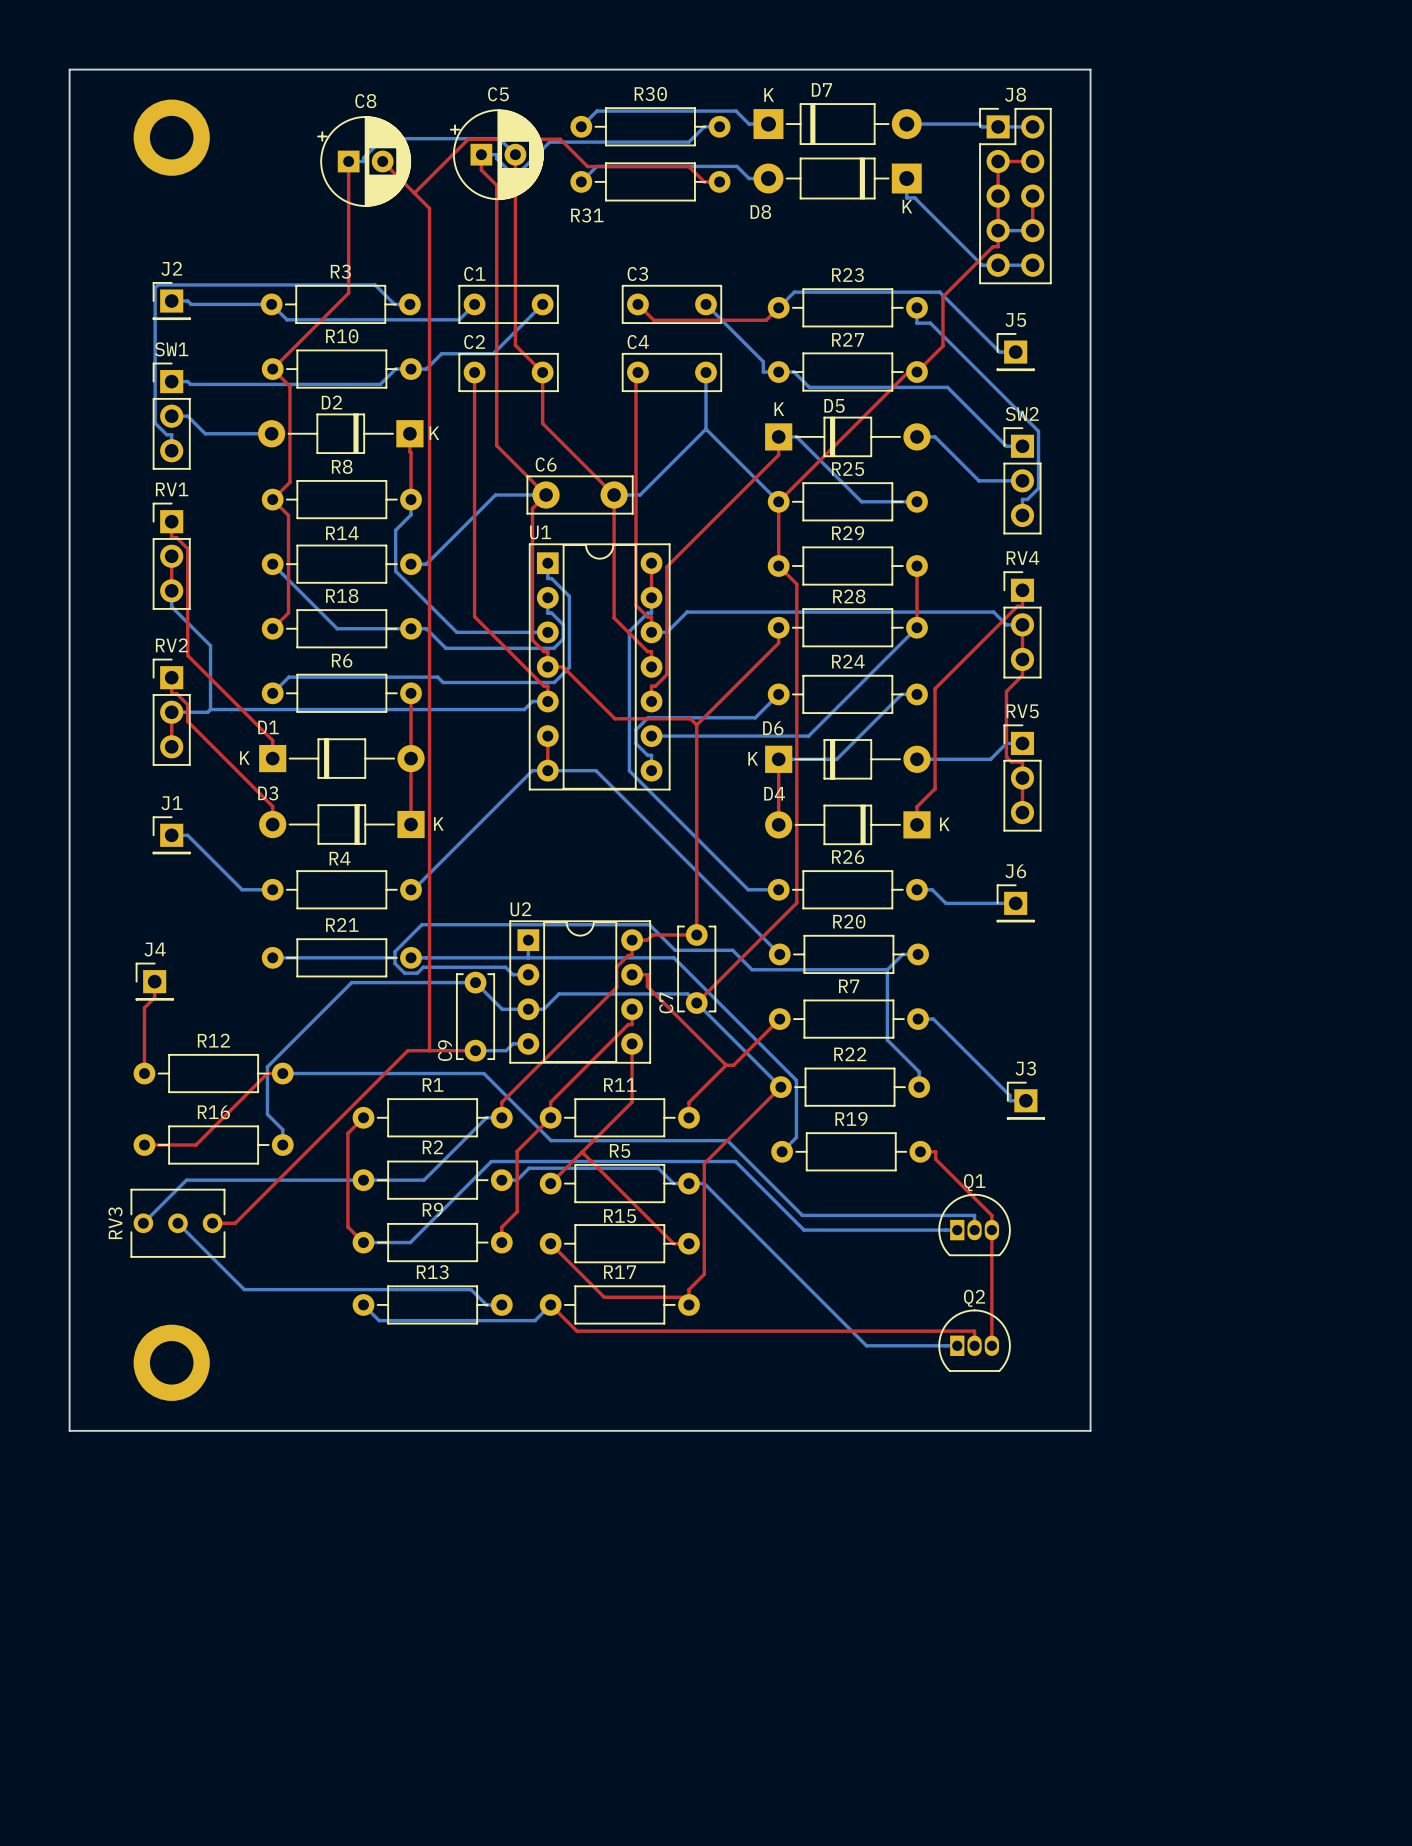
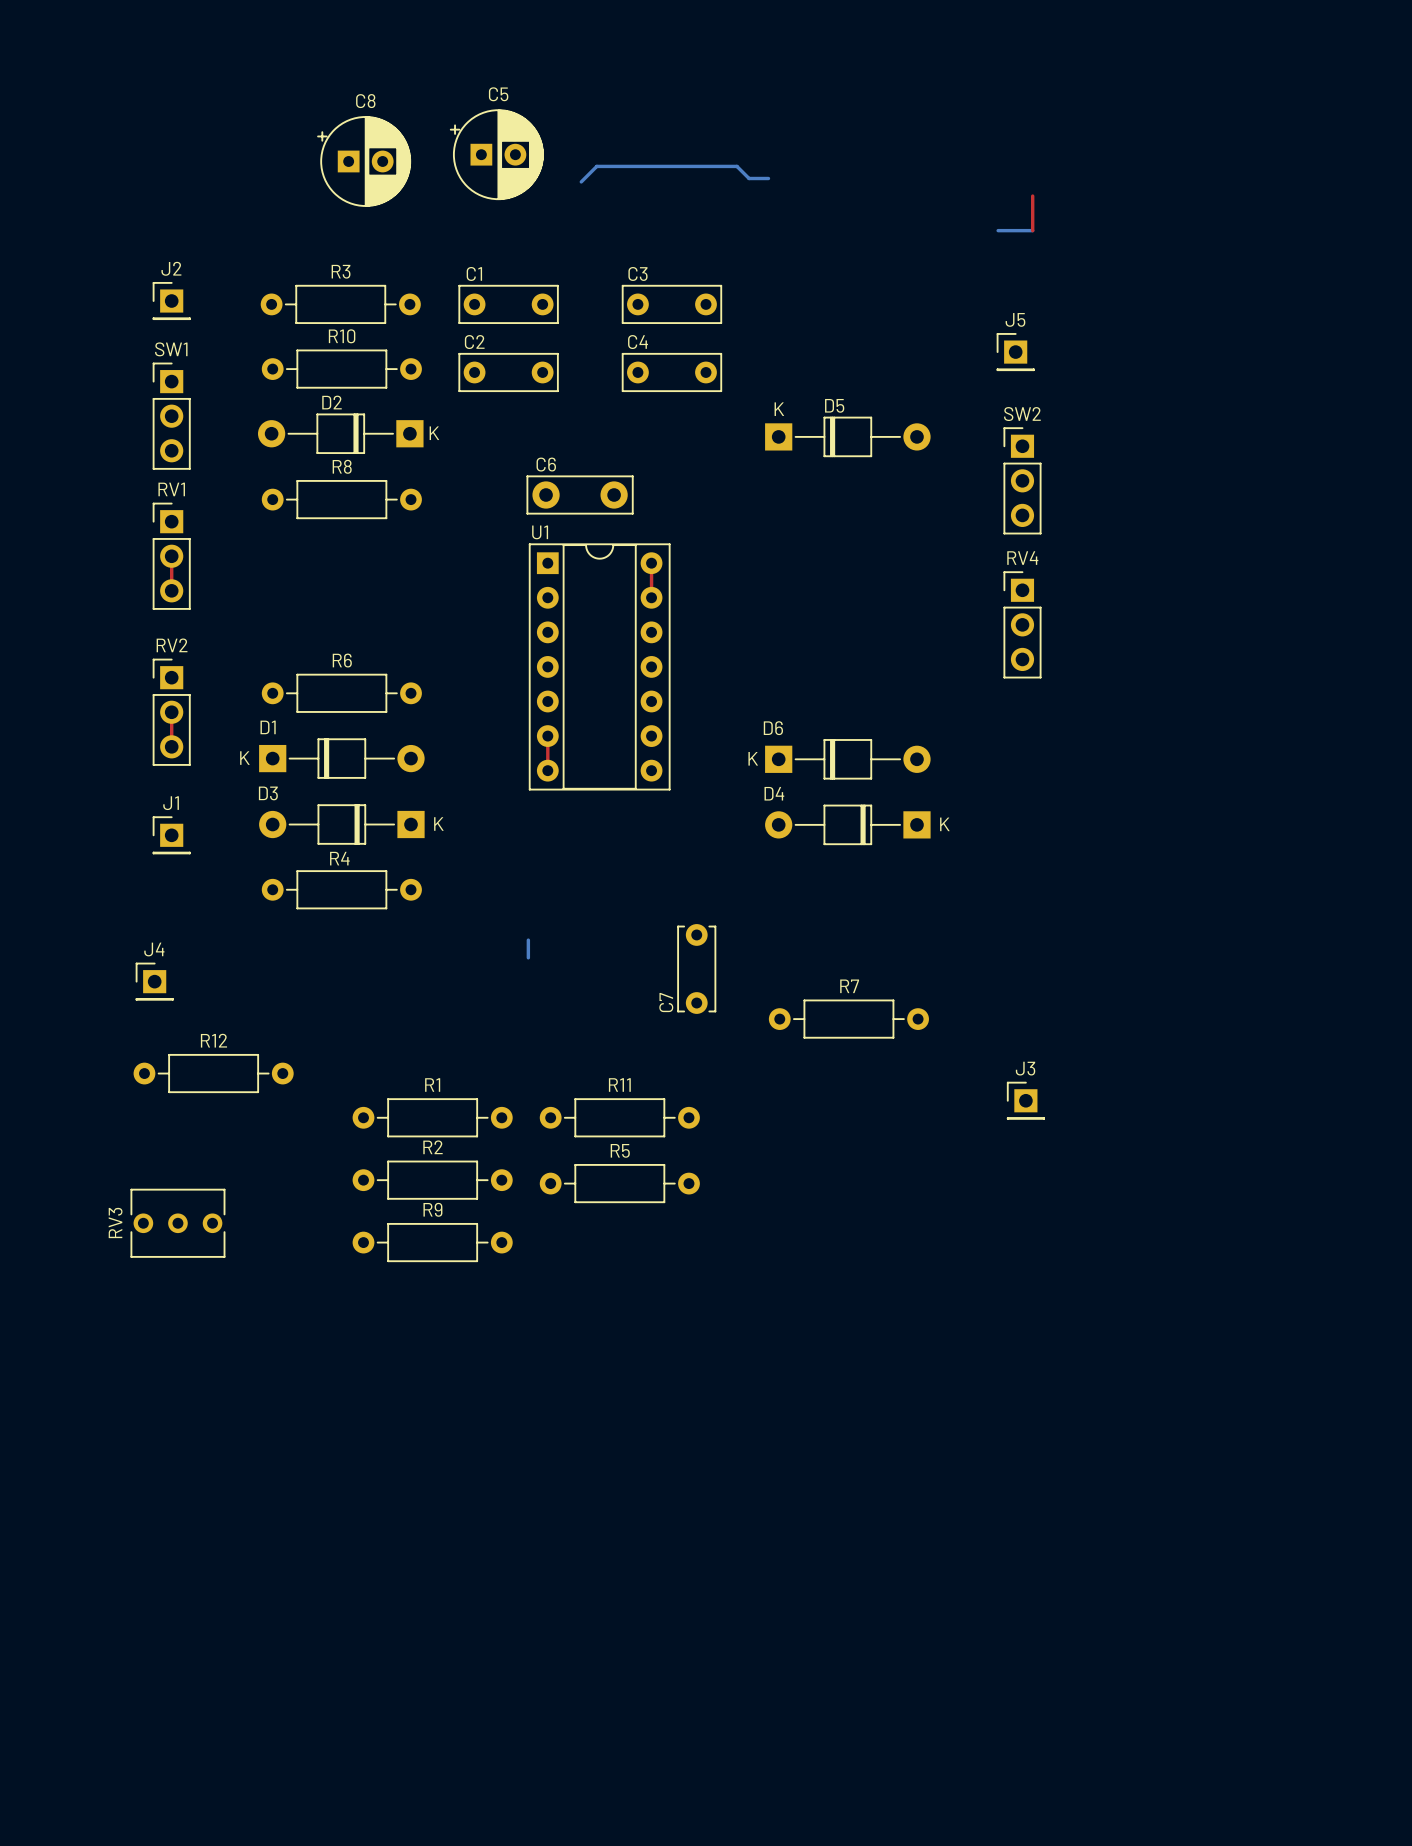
board edge: (69, 69) (1090, 69) (1090, 1430) (69, 1430) (69, 69) -> none
bottom track: (768, 124) (749, 124) (736, 111) (597, 111) (581, 126) -> none
D7: (837, 124) -> none
bottom track: (906, 124) (979, 124) (982, 126) (1032, 126) -> none
R30: (650, 126) -> none
bottom track: (719, 126) (704, 126) (688, 142) (549, 142) (521, 170) (508, 170) (496, 158) (496, 154) (481, 154) -> none
part: (171, 137) -> none
top track: (481, 154) (481, 170) (496, 185) (496, 445) (546, 495) (532, 508) (532, 640) (543, 651) (547, 651) (547, 666) (563, 666) (615, 718) (690, 718) (696, 725) -> none
bottom track: (515, 154) (499, 138) (383, 138) (364, 157) (364, 161) (348, 161) -> none
top track: (515, 154) (515, 345) (542, 372) (542, 423) (614, 495) (614, 617) (647, 651) (651, 651) (651, 666) -> none
top track: (348, 161) (348, 293) (272, 369) (289, 386) (289, 482) (272, 499) (288, 515) (288, 612) (272, 628) -> none
top track: (382, 161) (429, 208) (429, 1050) -> none
top track: (1032, 161) (998, 161) (998, 246) (993, 246) (942, 296) (942, 346) (916, 372) (908, 372) (778, 501) (778, 566) (796, 584) (796, 902) (696, 1003) -> none
D8: (837, 178) -> none
bottom track: (906, 178) (906, 197) (914, 197) (982, 265) (1032, 265) -> none
R31: (650, 181) -> none
top track: (719, 181) (704, 181) (688, 166) (587, 166) (560, 139) (468, 139) (414, 193) -> none
J8: (1015, 196) -> none
bottom track: (171, 301) (187, 301) (191, 304) (271, 304) (287, 319) (459, 319) (474, 304) -> none
bottom track: (409, 304) (394, 304) (375, 284) (158, 284) (155, 287) (155, 423) (166, 434) (171, 434) (171, 450) -> none
bottom track: (542, 304) (493, 353) (441, 353) (426, 369) (395, 369) (380, 384) (190, 384) (187, 381) (171, 381) -> none
top track: (637, 304) (653, 320) (766, 320) (778, 307) -> none
bottom track: (705, 304) (763, 361) (763, 372) (794, 372) (809, 387) (947, 387) (1006, 446) (1022, 446) -> none
bottom track: (778, 307) (794, 292) (939, 292) (999, 352) (1015, 352) -> none
R23: (847, 307) -> none
bottom track: (916, 307) (916, 323) (930, 323) (1038, 431) (1038, 488) (1027, 499) (1022, 499) (1022, 515) -> none
top track: (474, 372) (474, 616) (543, 686) (547, 686) (547, 701) -> none
top track: (637, 372) (636, 374) (636, 605) (647, 617) (651, 617) (651, 632) -> none
bottom track: (705, 372) (705, 429) -> none
R27: (847, 372) -> none
bottom track: (171, 416) (187, 416) (205, 433) (271, 433) -> none
bottom track: (705, 429) (640, 495) (614, 495) -> none
bottom track: (705, 429) (778, 501) -> none
top track: (409, 433) (411, 499) -> none
bottom track: (778, 436) (796, 436) (861, 501) (916, 501) -> none
top track: (778, 436) (778, 454) (666, 566) (666, 674) (655, 686) (651, 686) (651, 701) -> none
bottom track: (916, 436) (935, 436) (978, 480) (1022, 480) -> none
bottom track: (546, 495) (495, 495) (426, 564) (411, 564) -> none
bottom track: (411, 499) (411, 514) (395, 530) (395, 571) (456, 632) (547, 632) -> none
R25: (847, 501) -> none
top track: (171, 521) (171, 537) (176, 537) (187, 548) (187, 655) (272, 740) (272, 758) -> none
bottom track: (547, 563) (547, 578) (551, 578) (569, 596) (569, 667) (554, 682) (443, 682) (437, 677) (288, 677) (272, 693) -> none
bottom track: (272, 564) (337, 628) (426, 628) (445, 648) (554, 648) (563, 639) (563, 624) (551, 613) (547, 613) (547, 597) -> none
R14: (341, 564) -> none
R29: (847, 566) -> none
top track: (916, 566) (916, 627) -> none
bottom track: (171, 590) (171, 606) (210, 645) (210, 709) -> none
top track: (1022, 590) (1022, 606) (1017, 606) (935, 688) (935, 788) (916, 806) (916, 824) -> none
bottom track: (651, 597) (651, 613) (647, 613) (629, 631) (629, 770) (748, 889) (778, 889) -> none
bottom track: (1022, 624) (1006, 624) (993, 612) (687, 612) (666, 632) (651, 632) -> none
top track: (1022, 624) (1022, 675) (1006, 691) (1006, 756) (1011, 761) (1022, 761) (1022, 812) -> none
top track: (778, 627) (778, 643) (696, 725) -> none
R28: (847, 627) -> none
bottom track: (916, 627) (808, 736) (651, 736) -> none
R18: (341, 628) -> none
top track: (171, 677) (171, 693) (176, 693) (187, 704) (187, 721) (272, 806) (272, 824) -> none
top track: (411, 693) (411, 824) -> none
bottom track: (778, 694) (755, 717) (648, 717) (636, 729) (636, 743) (647, 755) (651, 755) (651, 770) -> none
R24: (847, 694) -> none
bottom track: (916, 694) (901, 694) (836, 759) (778, 759) -> none
bottom track: (547, 701) (532, 701) (524, 709) (210, 709) -> none
bottom track: (210, 709) (207, 712) (171, 712) -> none
top track: (696, 725) (696, 934) (652, 934) (647, 940) (632, 940) (632, 955) (628, 955) (616, 966) (616, 987) (501, 1102) (501, 1117) -> none
bottom track: (1022, 743) (1006, 743) (990, 759) (916, 759) -> none
top track: (778, 759) (778, 824) -> none
RV5: (1022, 778) -> none
bottom track: (171, 835) (187, 835) (242, 889) (272, 889) -> none
bottom track: (411, 889) (413, 889) (532, 770) (596, 770) (779, 954) -> none
R26: (847, 889) -> none
bottom track: (916, 889) (932, 889) (945, 903) (1015, 903) -> none
J6: (1015, 903) -> none
R20: (848, 954) -> none
bottom track: (918, 954) (902, 954) (887, 969) -> none
bottom track: (272, 957) (395, 957) -> none
R21: (341, 957) -> none
bottom track: (411, 957) (673, 957) (796, 1080) (796, 1137) (782, 1151) -> none
bottom track: (887, 969) (752, 969) (732, 950) (675, 950) (649, 924) (421, 924) (395, 951) (395, 963) (404, 973) (417, 973) (423, 967) (505, 967) (513, 974) (528, 974) -> none
bottom track: (887, 969) (887, 1040) (919, 1071) (919, 1087) -> none
top track: (632, 974) (647, 974) (647, 986) (726, 1065) -> none
top track: (154, 981) (154, 997) (144, 1007) (144, 1073) -> none
U2: (580, 991) -> none
top track: (632, 1009) (632, 1024) (628, 1024) (550, 1102) (550, 1117) (517, 1151) (517, 1211) (501, 1227) (501, 1242) -> none
C9: (475, 1016) -> none
top track: (779, 1019) (733, 1065) (726, 1065) -> none
bottom track: (918, 1019) (933, 1019) (1009, 1095) (1009, 1100) (1025, 1100) -> none
bottom track: (528, 1043) (513, 1043) (506, 1050) (475, 1050) -> none
top track: (632, 1043) (632, 1102) (550, 1183) -> none
top track: (475, 1050) (407, 1050) (235, 1223) (212, 1223) -> none
top track: (726, 1065) (688, 1102) (688, 1117) -> none
bottom track: (282, 1073) (483, 1073) (551, 1140) (727, 1140) (802, 1215) (974, 1215) (974, 1230) -> none
top track: (282, 1073) (267, 1073) (195, 1145) (144, 1145) -> none
bottom track: (780, 1087) (687, 993) (559, 993) (543, 1009) (502, 1009) (475, 982) (351, 982) (267, 1066) (267, 1114) (282, 1129) (282, 1145) -> none
top track: (780, 1087) (704, 1163) (704, 1274) (688, 1289) (688, 1304) -> none
R22: (850, 1087) -> none
top track: (363, 1117) (347, 1133) (347, 1226) (363, 1242) -> none
bottom track: (501, 1117) (486, 1117) (424, 1180) (186, 1180) (143, 1223) -> none
R16: (213, 1145) -> none
R19: (851, 1151) -> none
top track: (920, 1151) (935, 1151) (935, 1159) (991, 1215) (991, 1345) -> none
top track: (582, 1152) (673, 1243) (688, 1243) -> none
bottom track: (501, 1180) (517, 1180) (529, 1168) (658, 1168) (673, 1183) (704, 1183) (866, 1345) (957, 1345) -> none
bottom track: (177, 1223) (244, 1289) (471, 1289) (486, 1304) (501, 1304) -> none
Q1: (974, 1224) -> none
bottom track: (957, 1230) (804, 1230) (735, 1161) (491, 1161) (410, 1242) (363, 1242) -> none
top track: (550, 1243) (604, 1297) (688, 1297) -> none
R15: (619, 1243) -> none
bottom track: (363, 1304) (379, 1320) (534, 1320) (550, 1304) -> none
R13: (432, 1304) -> none
top track: (550, 1304) (576, 1331) (974, 1331) (974, 1345) -> none
R17: (619, 1304) -> none
Q2: (974, 1340) -> none
part: (171, 1362) -> none

